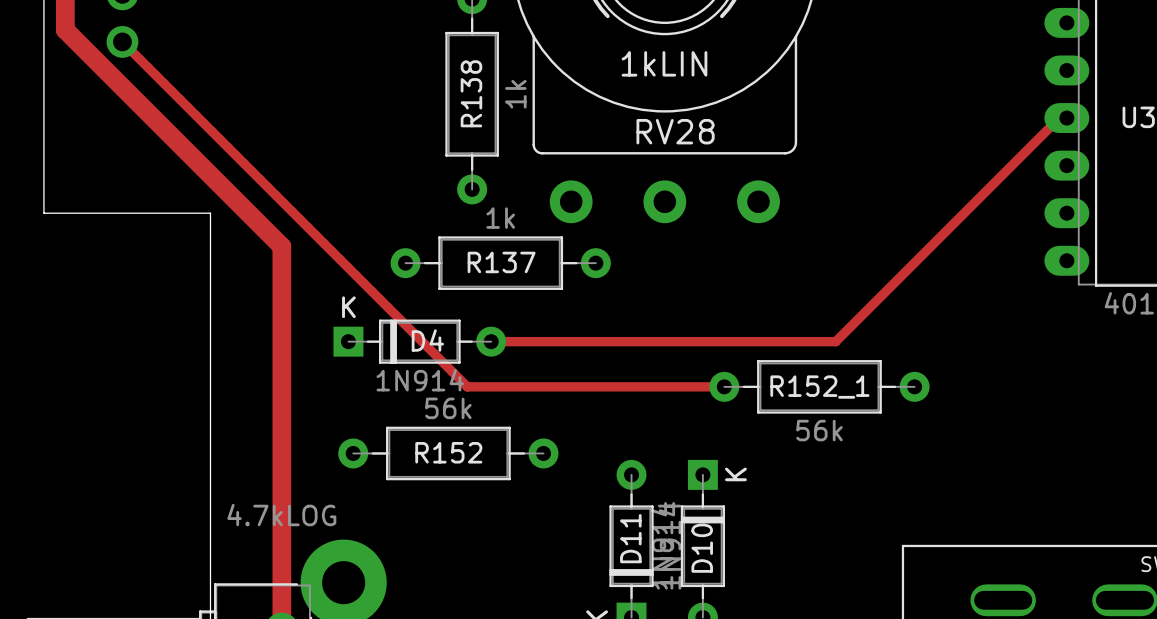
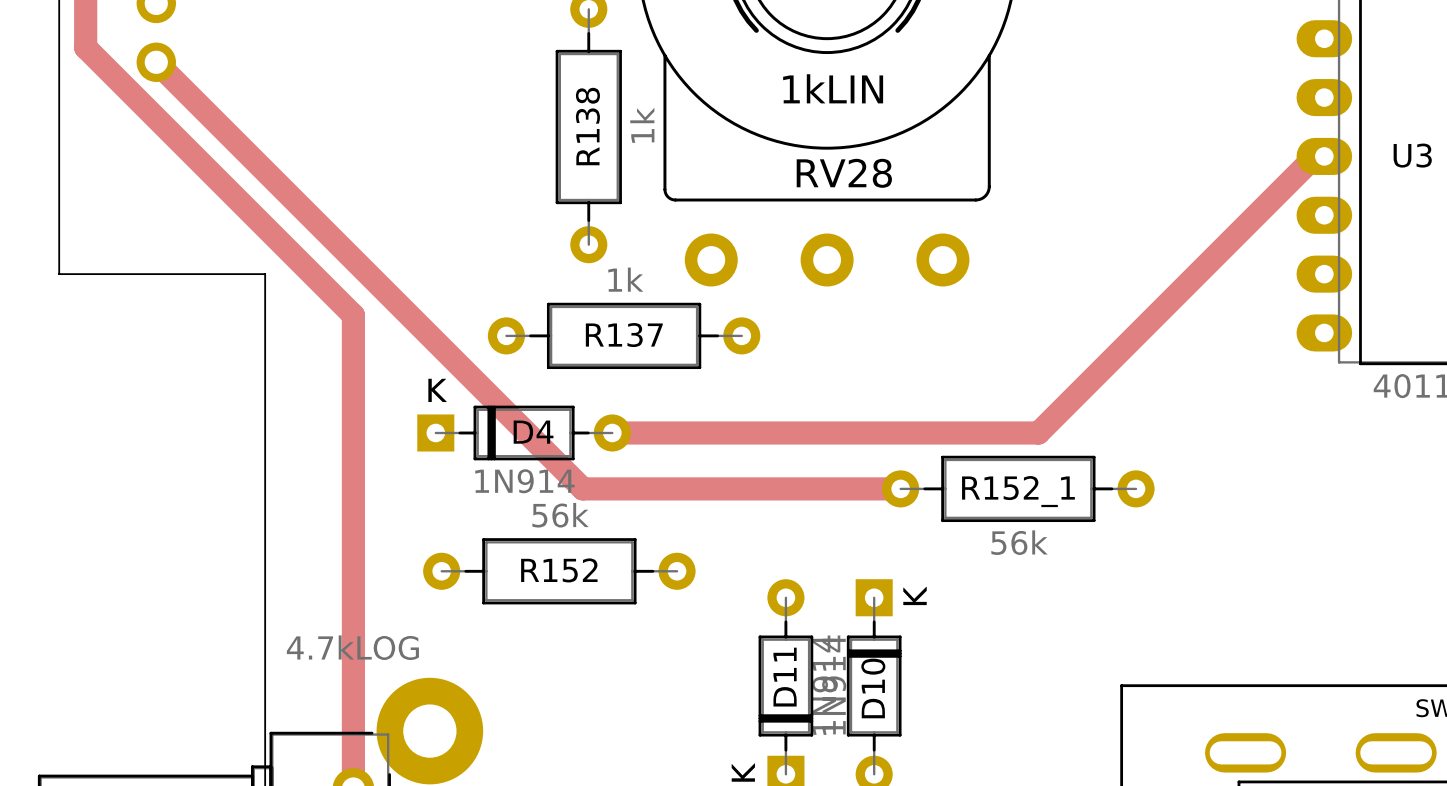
track width: thin (122, 41) (467, 386) (724, 386) -> thick (156, 62) (582, 488) (900, 488)
track width: thin (1066, 118) (1059, 118) (835, 341) (491, 341) -> thick (1324, 156) (1315, 156) (1038, 432) (612, 432)

